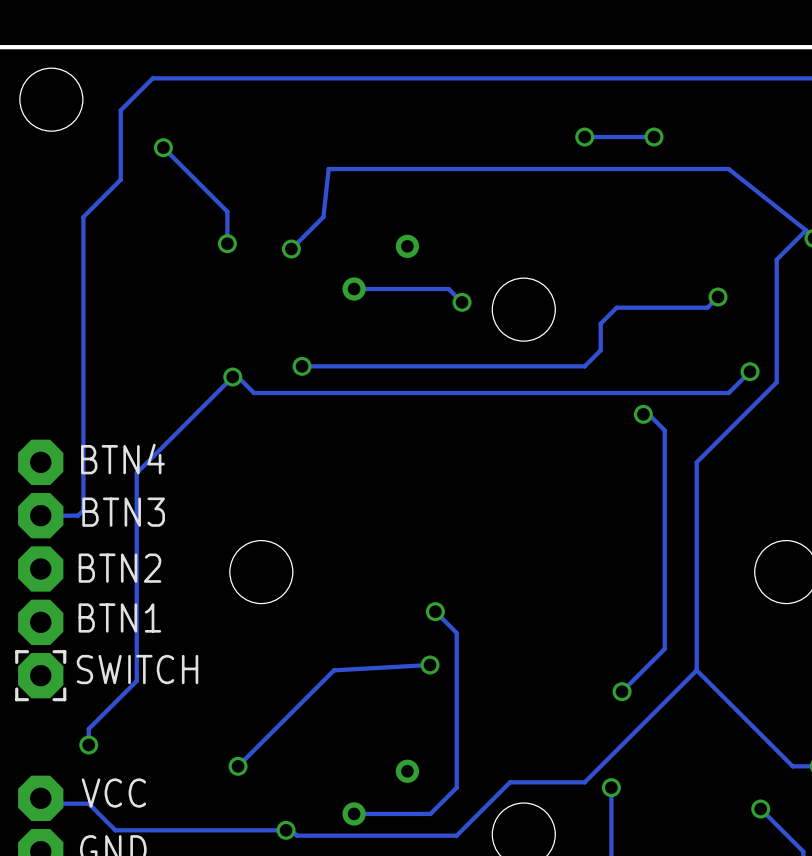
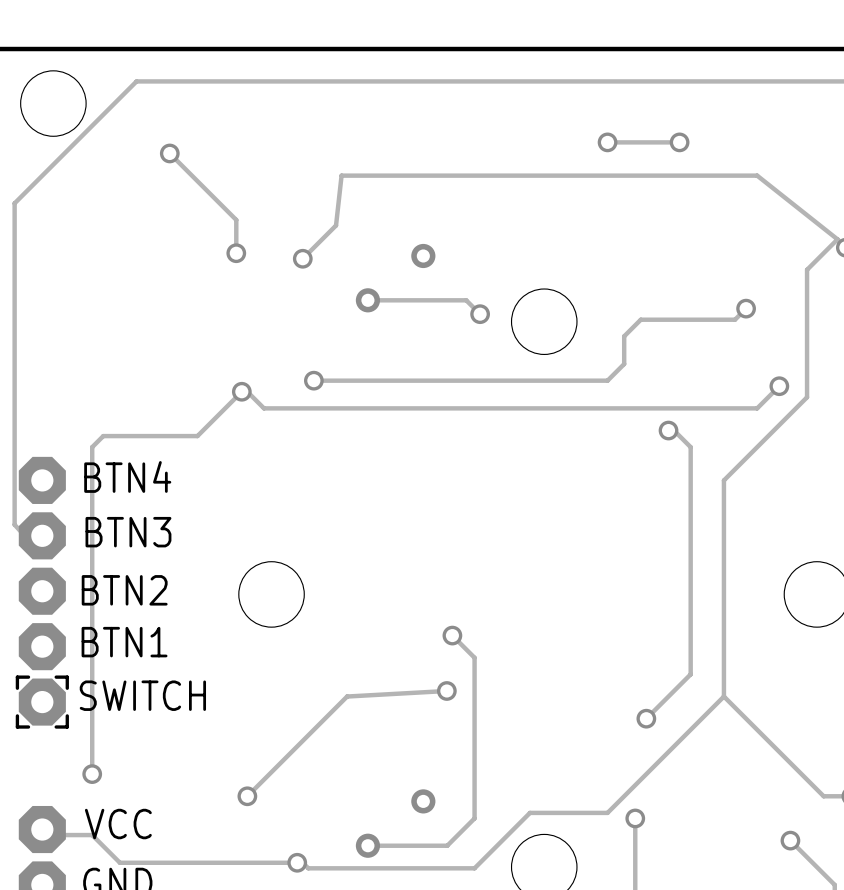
track: (152, 78) (120, 110) (120, 179) (83, 217) (83, 510) (78, 515) (40, 515) -> (158, 81) (136, 81) (14, 203) (14, 524) (22, 533) (47, 533)
track: (190, 419) (136, 473) (136, 681) (88, 729) -> (197, 436) (103, 436) (92, 447) (92, 757)

